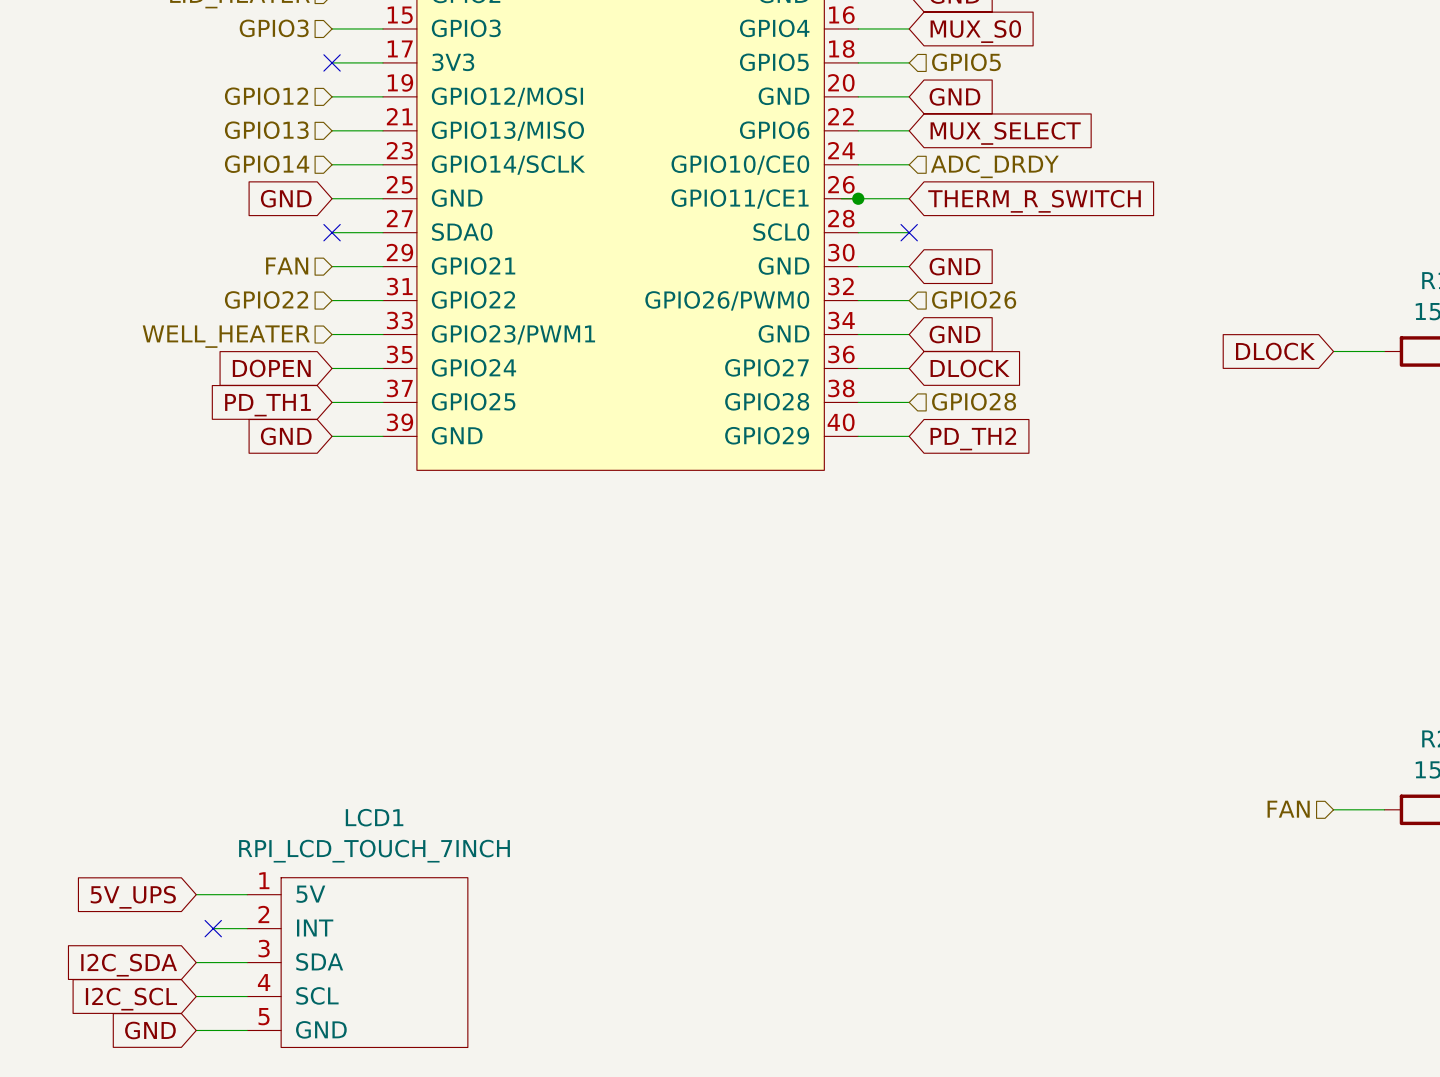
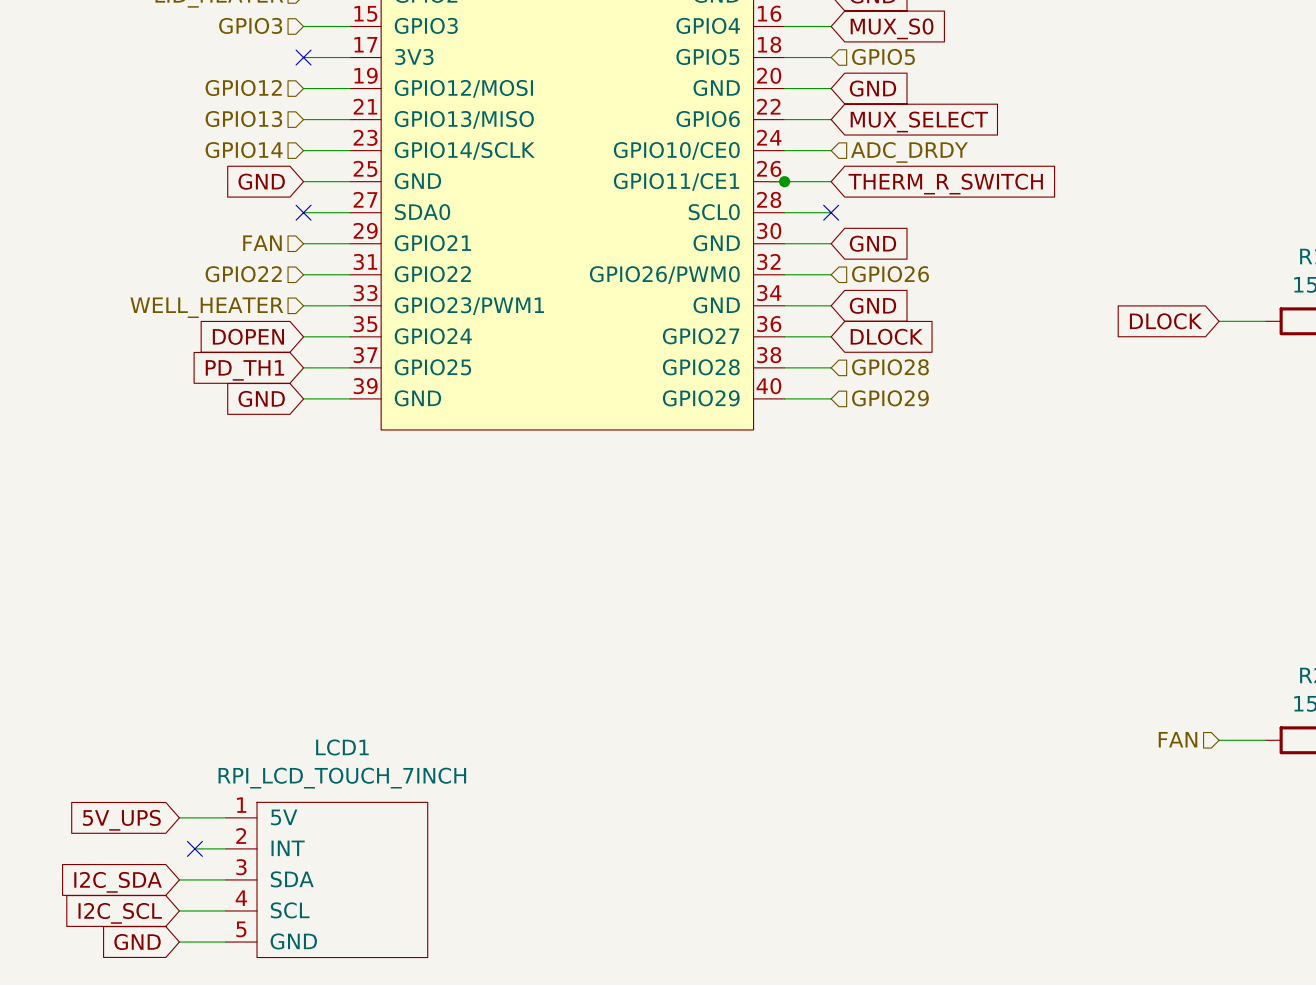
hierarchical label: none -> GPIO29 (890, 398)
global label: PD_TH2 (973, 438) -> none

